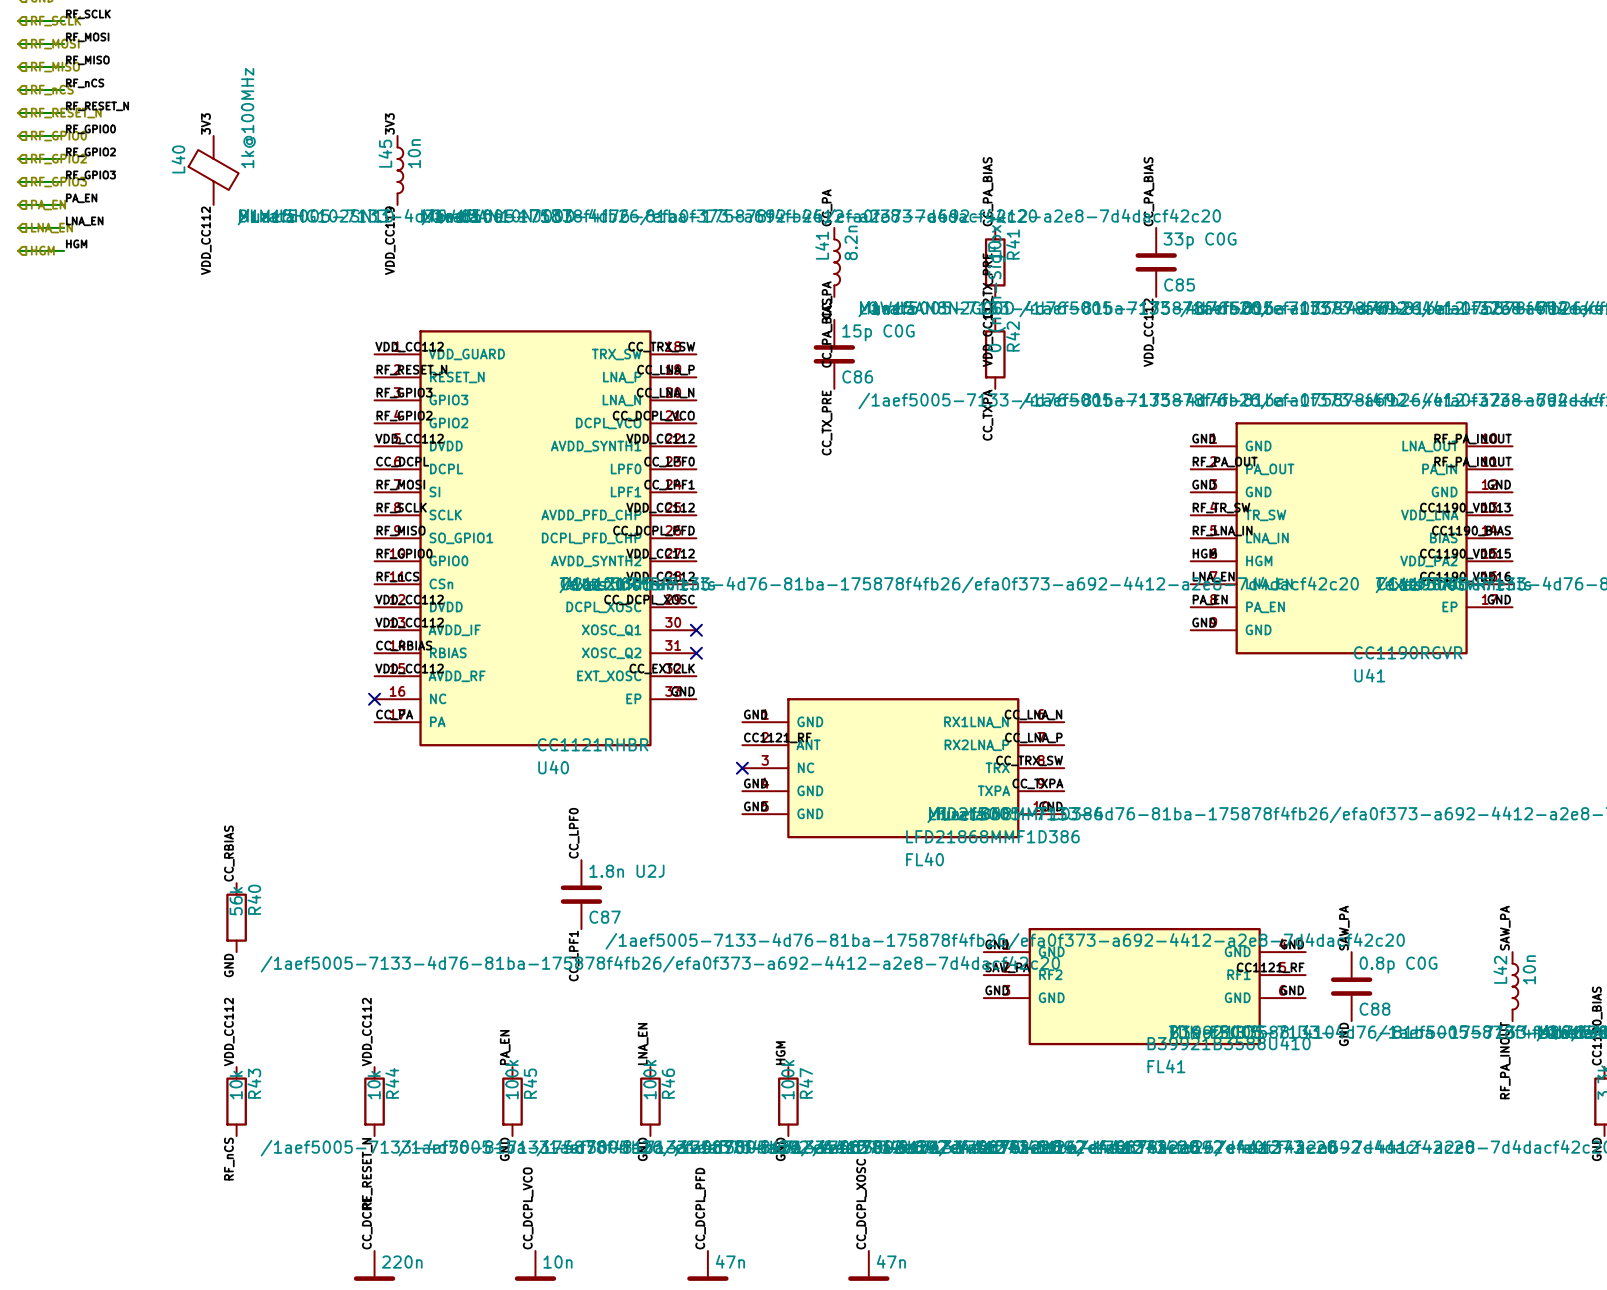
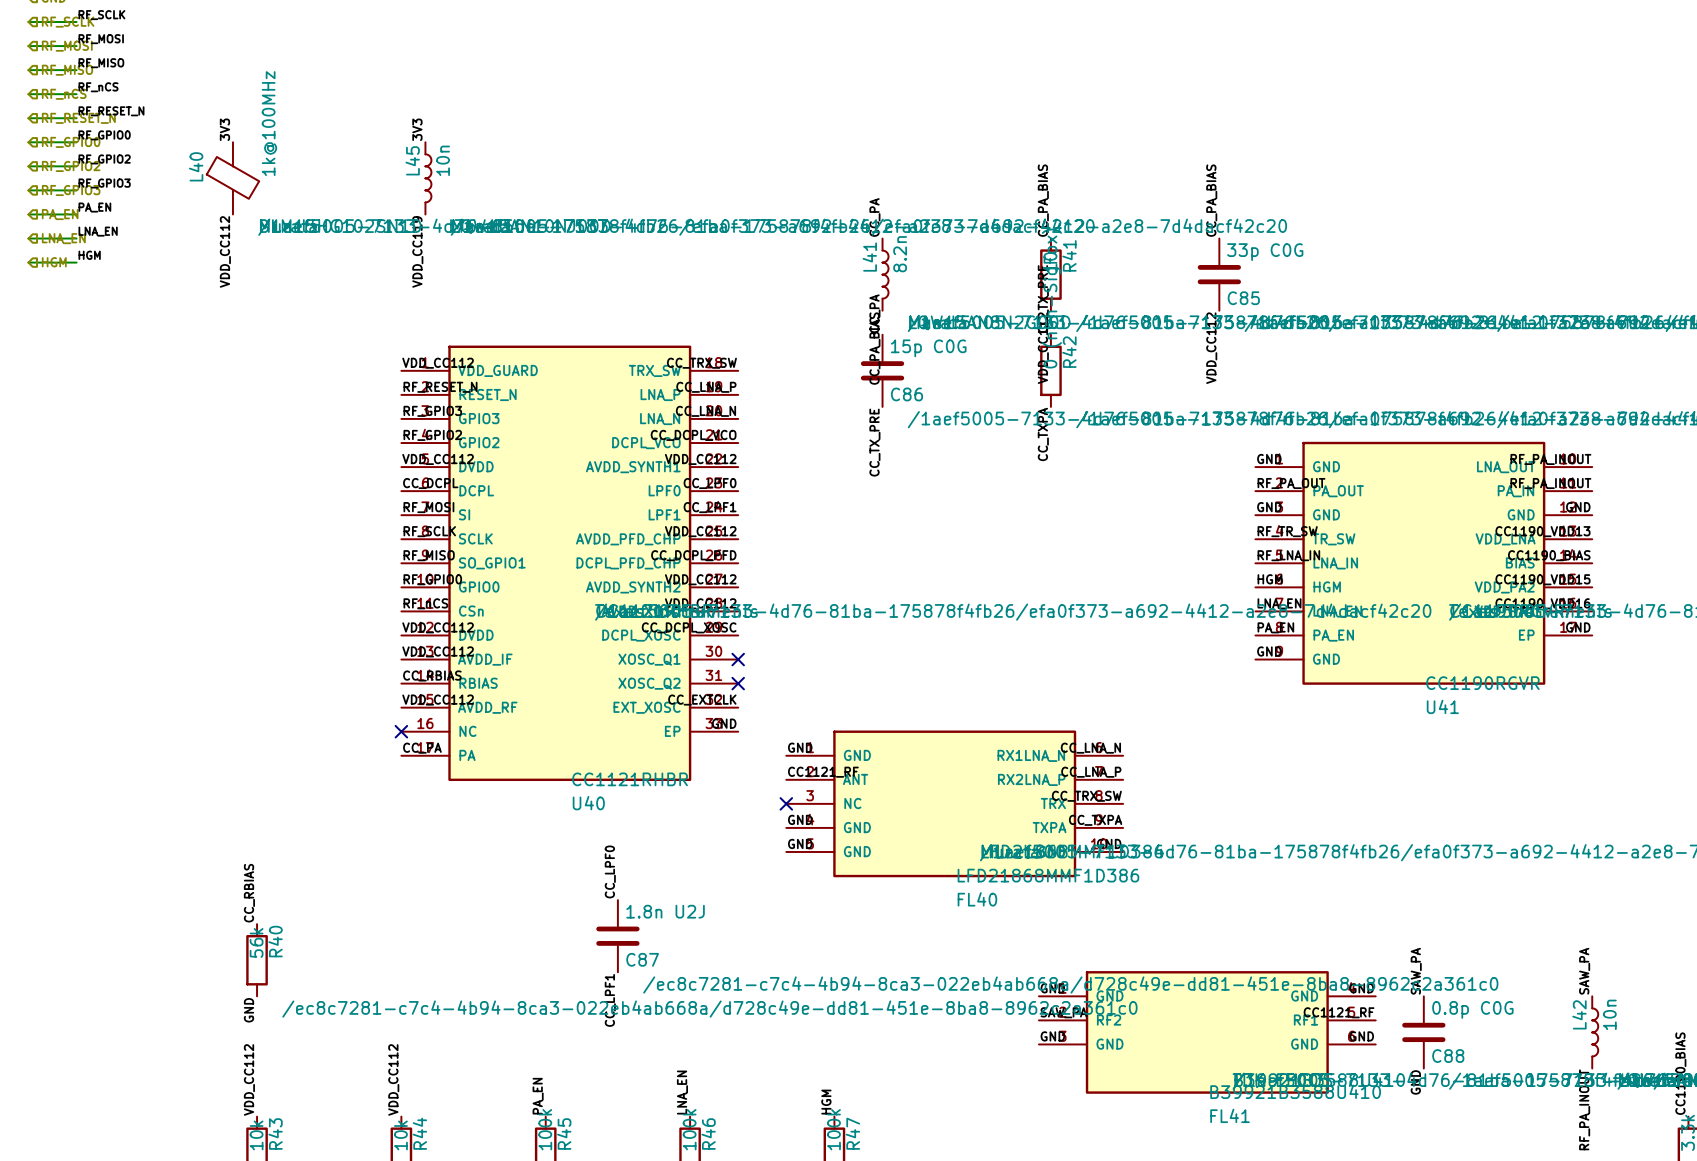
C87 text: /1aef5005-7133-4d76-81ba-175878f4fb26/efa0f373-a692-4412-a2e8-7d4dacf42c20 (1005, 941) -> /ec8c7281-c7c4-4b94-8ca3-022eb4ab668a/d728c49e-dd81-451e-8ba8-8962c2a361c0 (1070, 985)
R40 text: /1aef5005-7133-4d76-81ba-175878f4fb26/efa0f373-a692-4412-a2e8-7d4dacf42c20 (660, 964) -> /ec8c7281-c7c4-4b94-8ca3-022eb4ab668a/d728c49e-dd81-451e-8ba8-8962c2a361c0 (709, 1009)

